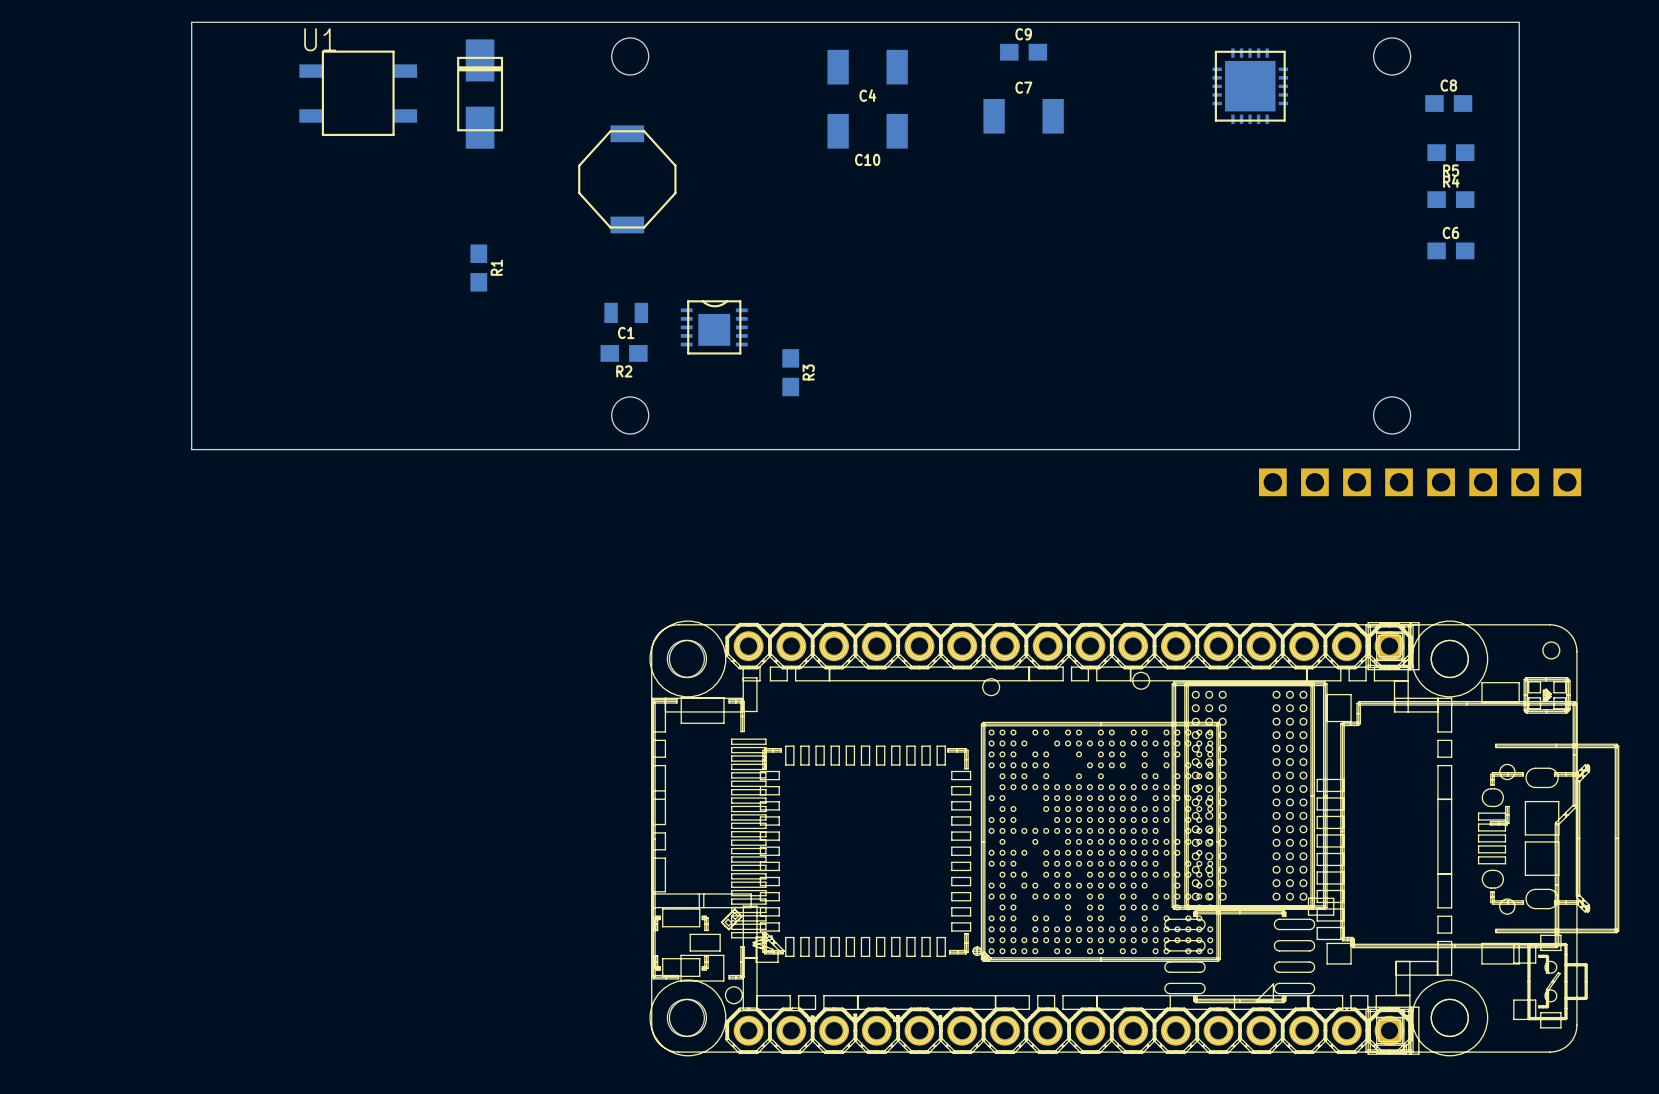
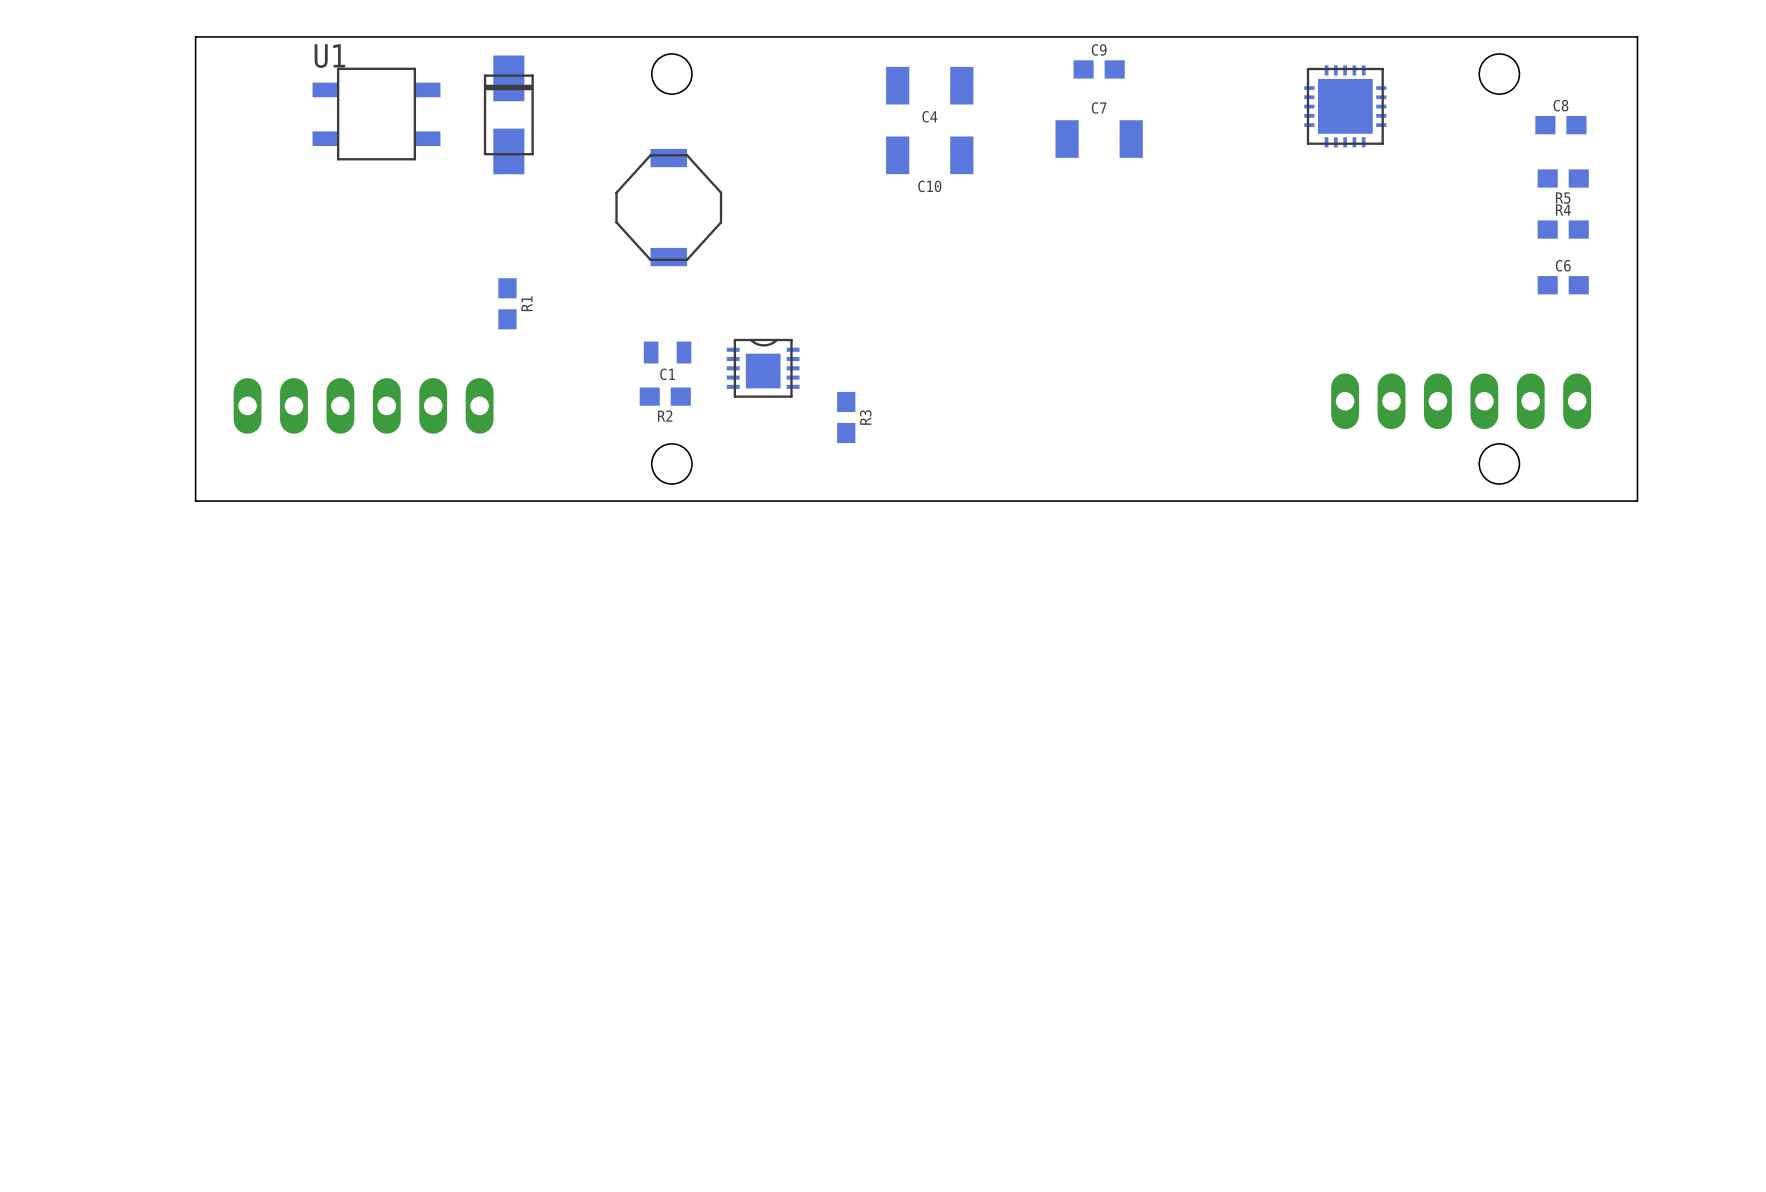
part: none -> (1461, 401)
part: none -> (363, 405)
part: (1420, 482) -> none
part: (1134, 838) -> none

